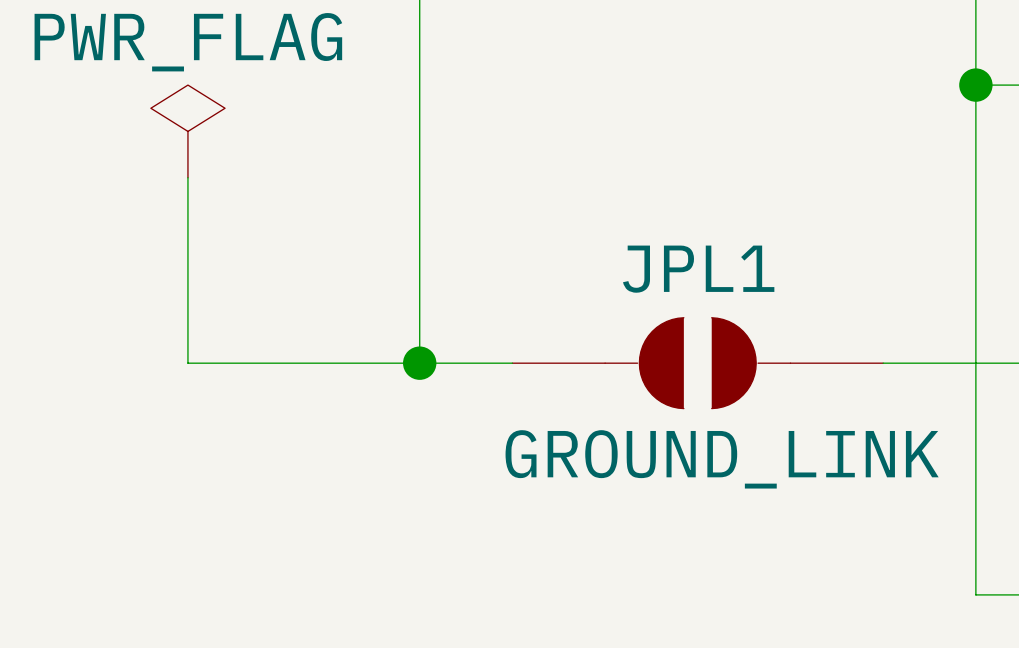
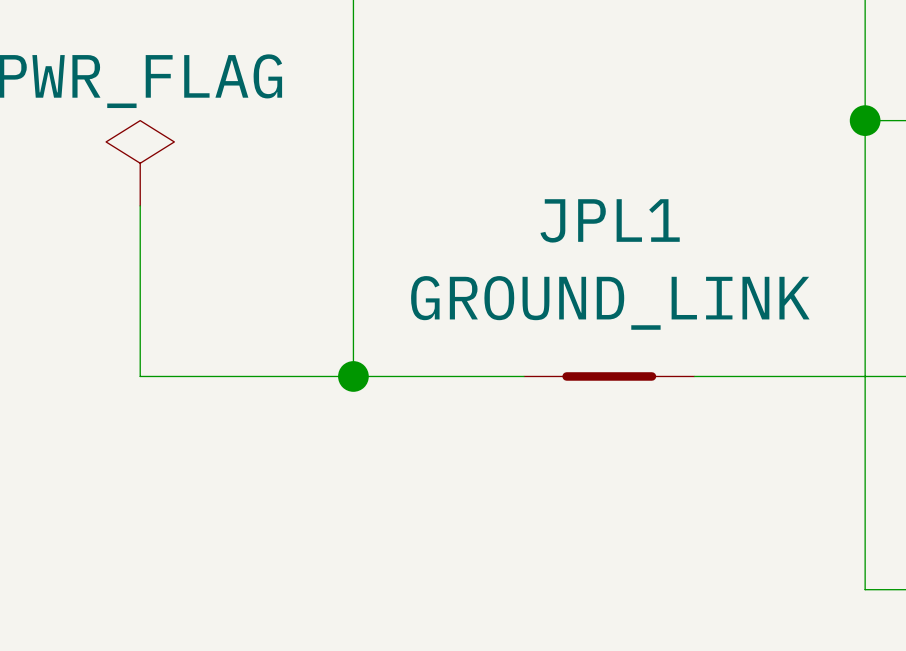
JPL1 name position: JPL1 (698, 269) -> JPL1 (610, 220)
JPL1 symbol: [512, 317, 884, 410] -> [524, 372, 695, 381]
JPL1 value position: GROUND_LINK (722, 459) -> GROUND_LINK (610, 302)

